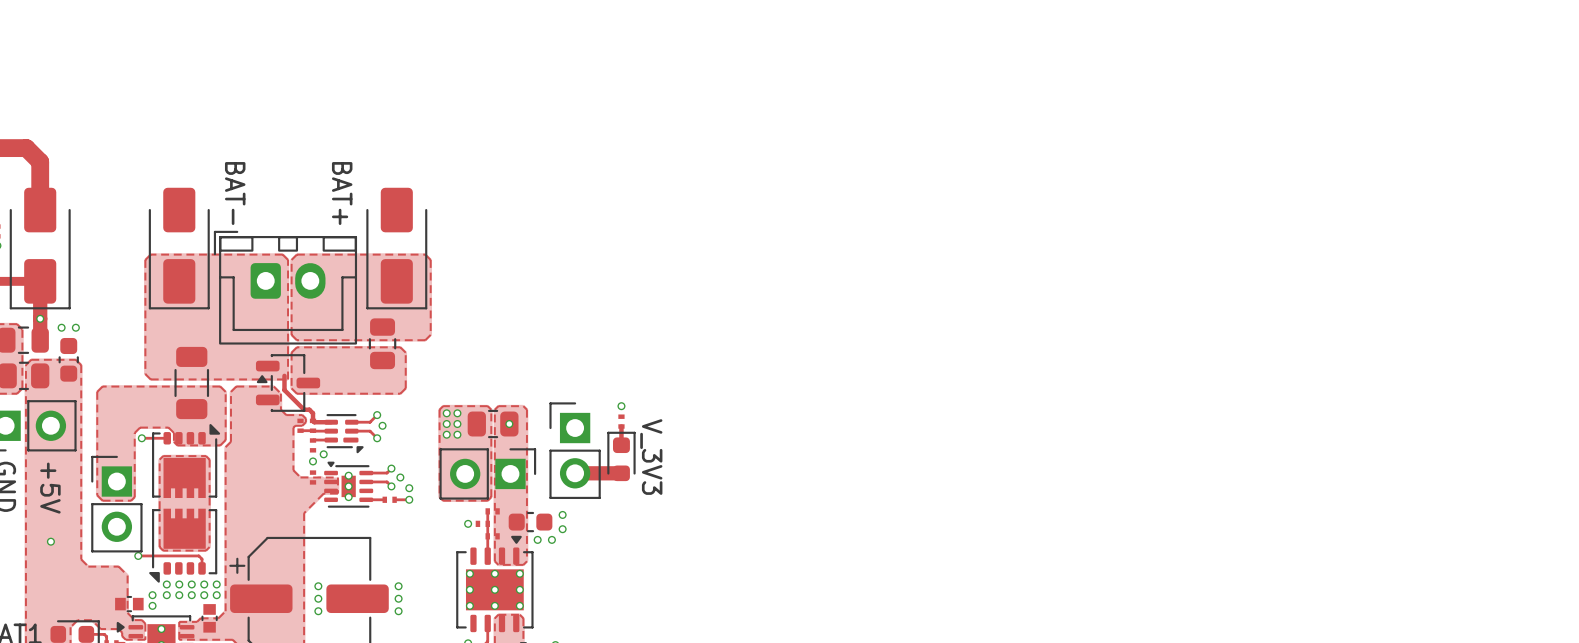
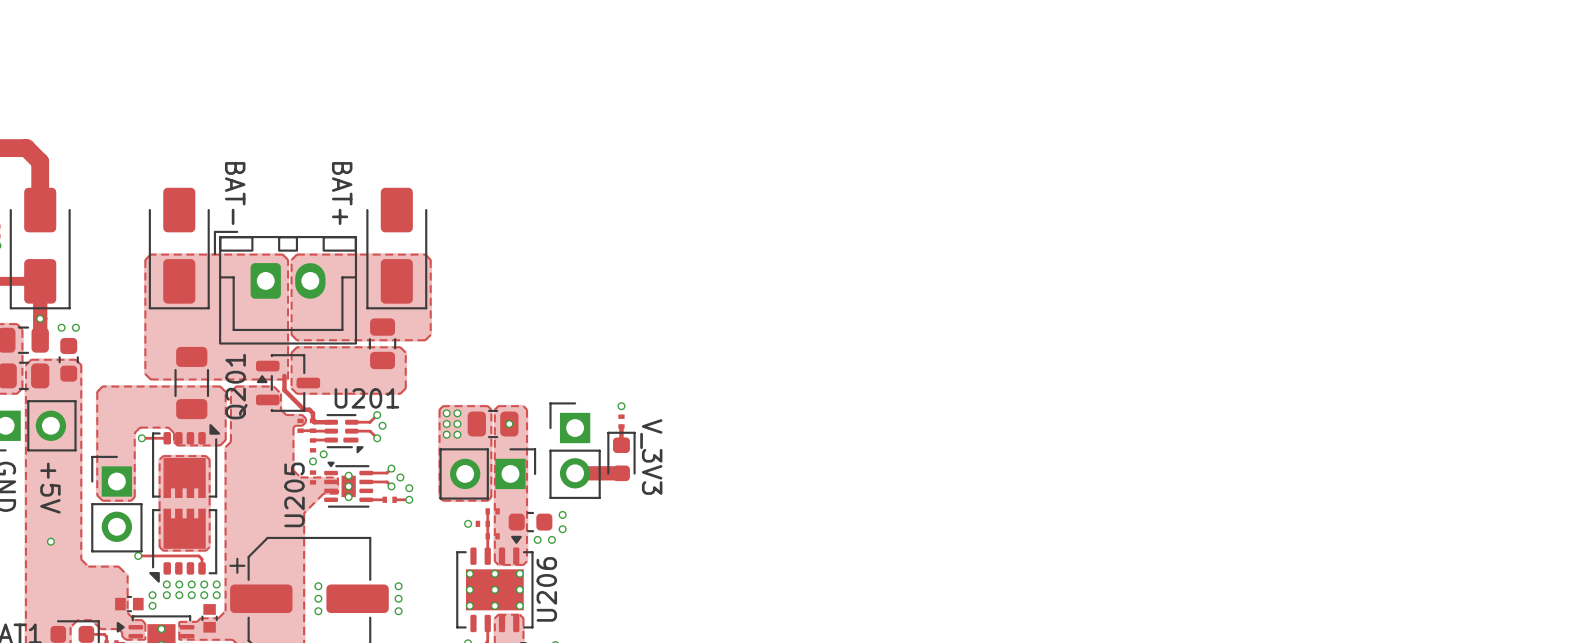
Q201 name: none -> Q201 (236, 386)
U201 name: none -> U201 (366, 398)
U205 name: none -> U205 (294, 494)
U206 name: none -> U206 (546, 589)

